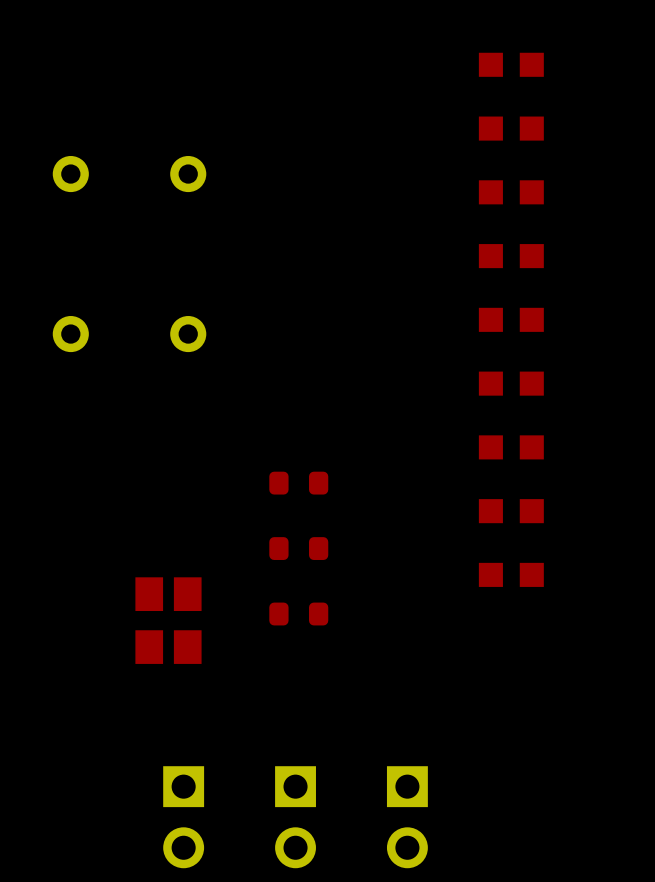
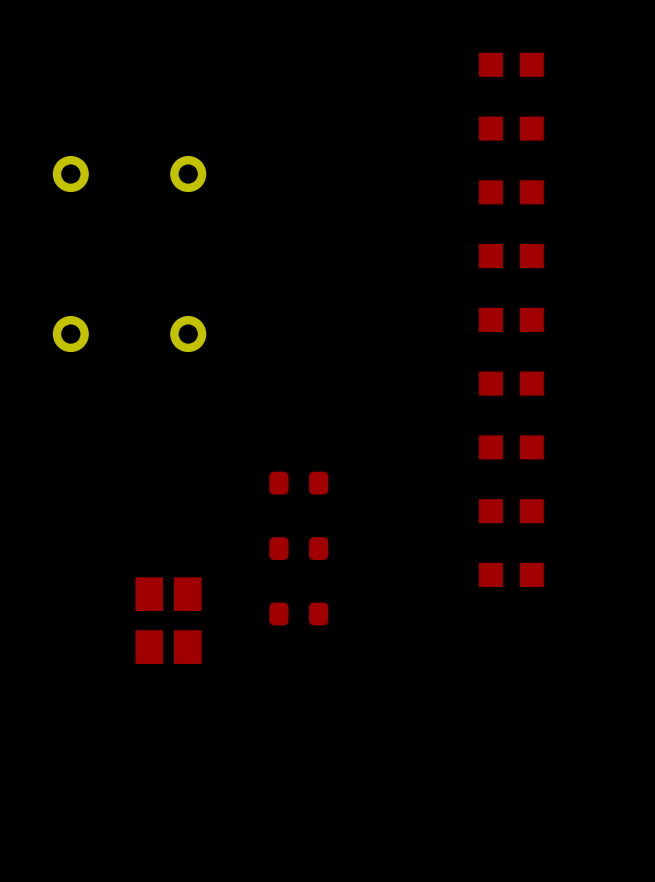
part: (183, 817) -> none
part: (295, 817) -> none
part: (407, 817) -> none

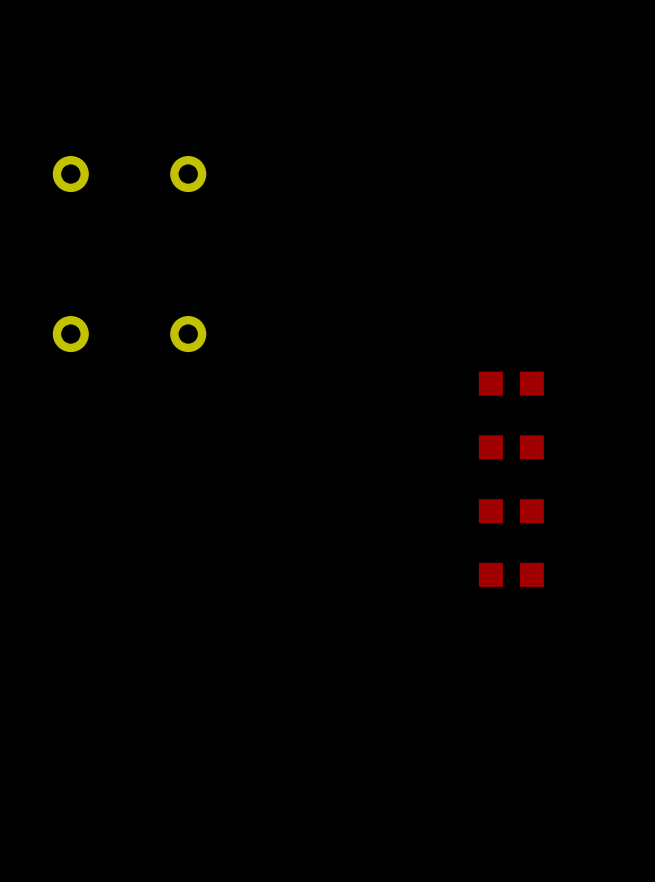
part: (511, 64) -> none
part: (511, 128) -> none
part: (511, 192) -> none
part: (511, 256) -> none
part: (511, 319) -> none
part: (298, 483) -> none
part: (298, 548) -> none
part: (298, 614) -> none
part: (168, 620) -> none

